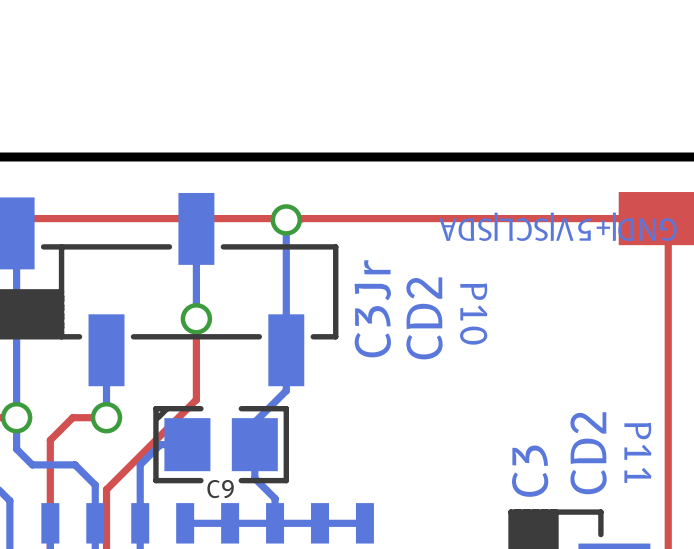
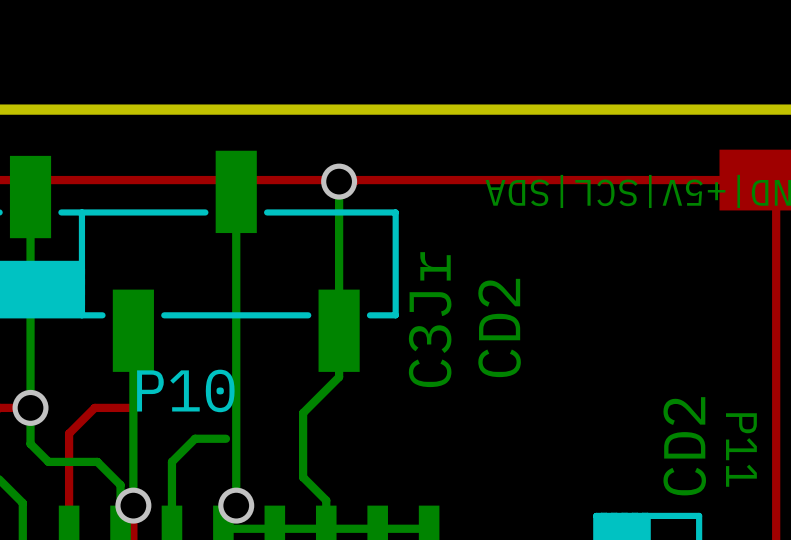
text position: C3Jr (372, 308) -> C3Jr (430, 319)
text: P10 (473, 314) -> none
bottom track: none -> (236, 294) (236, 505)
top track: (196, 318) (196, 399) (106, 489) (106, 503) -> none
via: (196, 318) -> none
text position: CD2 (424, 318) -> CD2 (499, 327)
P10 name: none -> P10 (185, 390)
bottom track: none -> (133, 407) (133, 505)
via: (106, 417) -> none
C9: (221, 444) -> none
text: C3 (530, 471) -> none
via: none -> (133, 505)
via: none -> (236, 505)

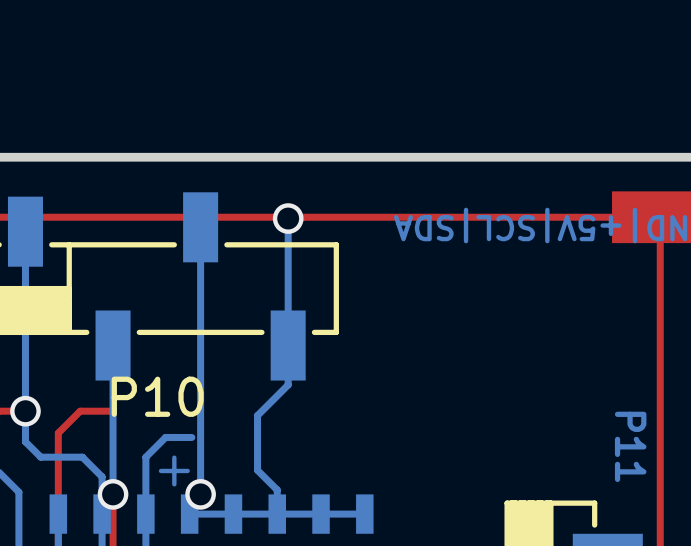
text: C3Jr (430, 319) -> none
text: CD2 (499, 327) -> none
text: CD2 (684, 446) -> none
text: none -> + (174, 470)

